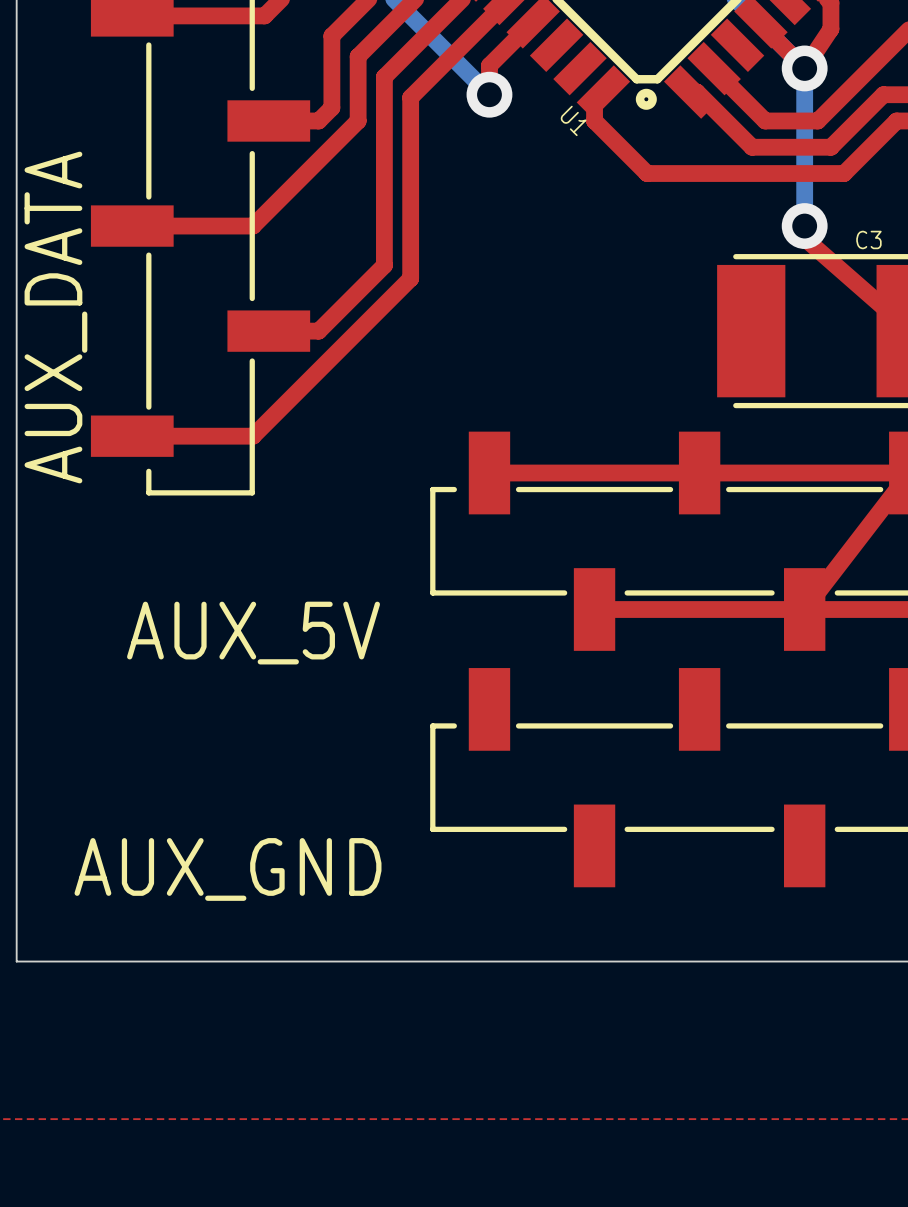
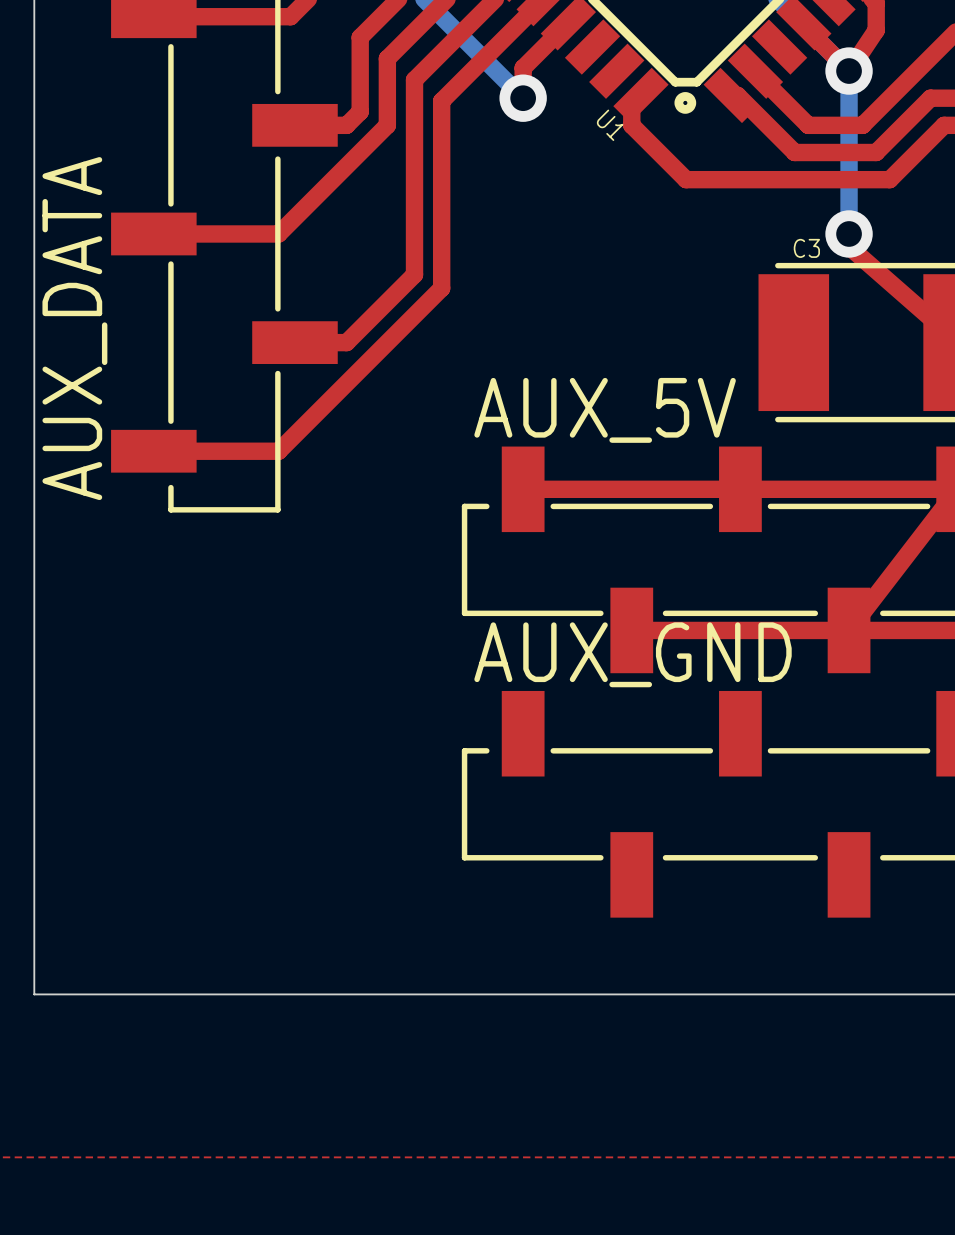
C3 name position: C3 (868, 239) -> C3 (806, 248)
AUX_5V name position: AUX_5V (253, 633) -> AUX_5V (605, 410)
AUX_GND name position: AUX_GND (228, 869) -> AUX_GND (633, 654)

